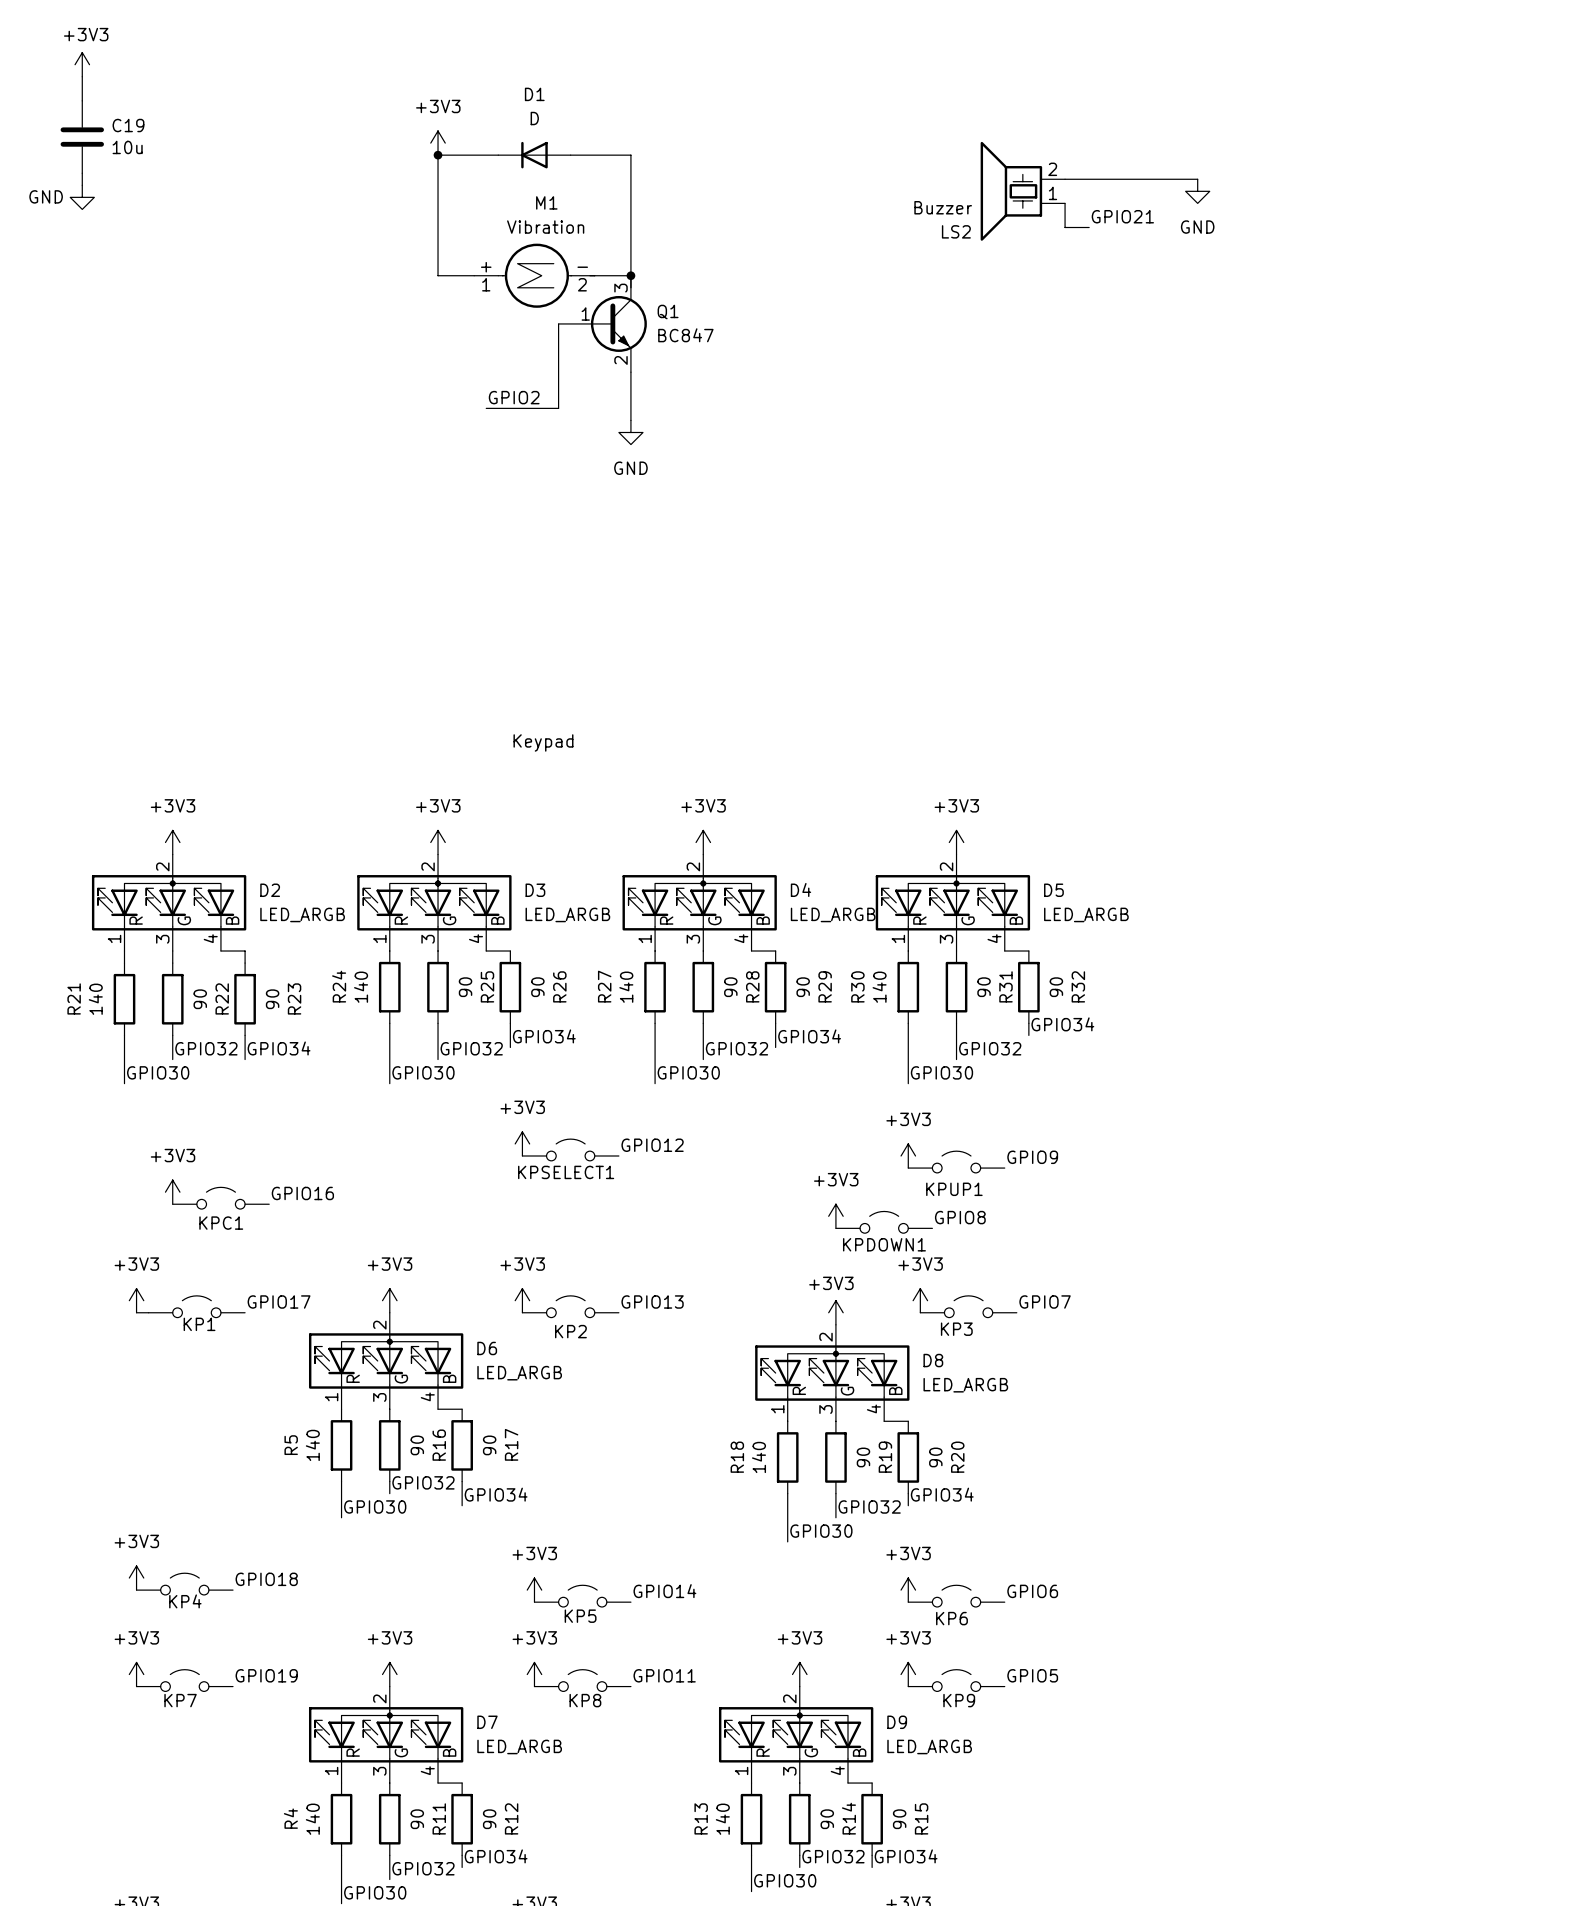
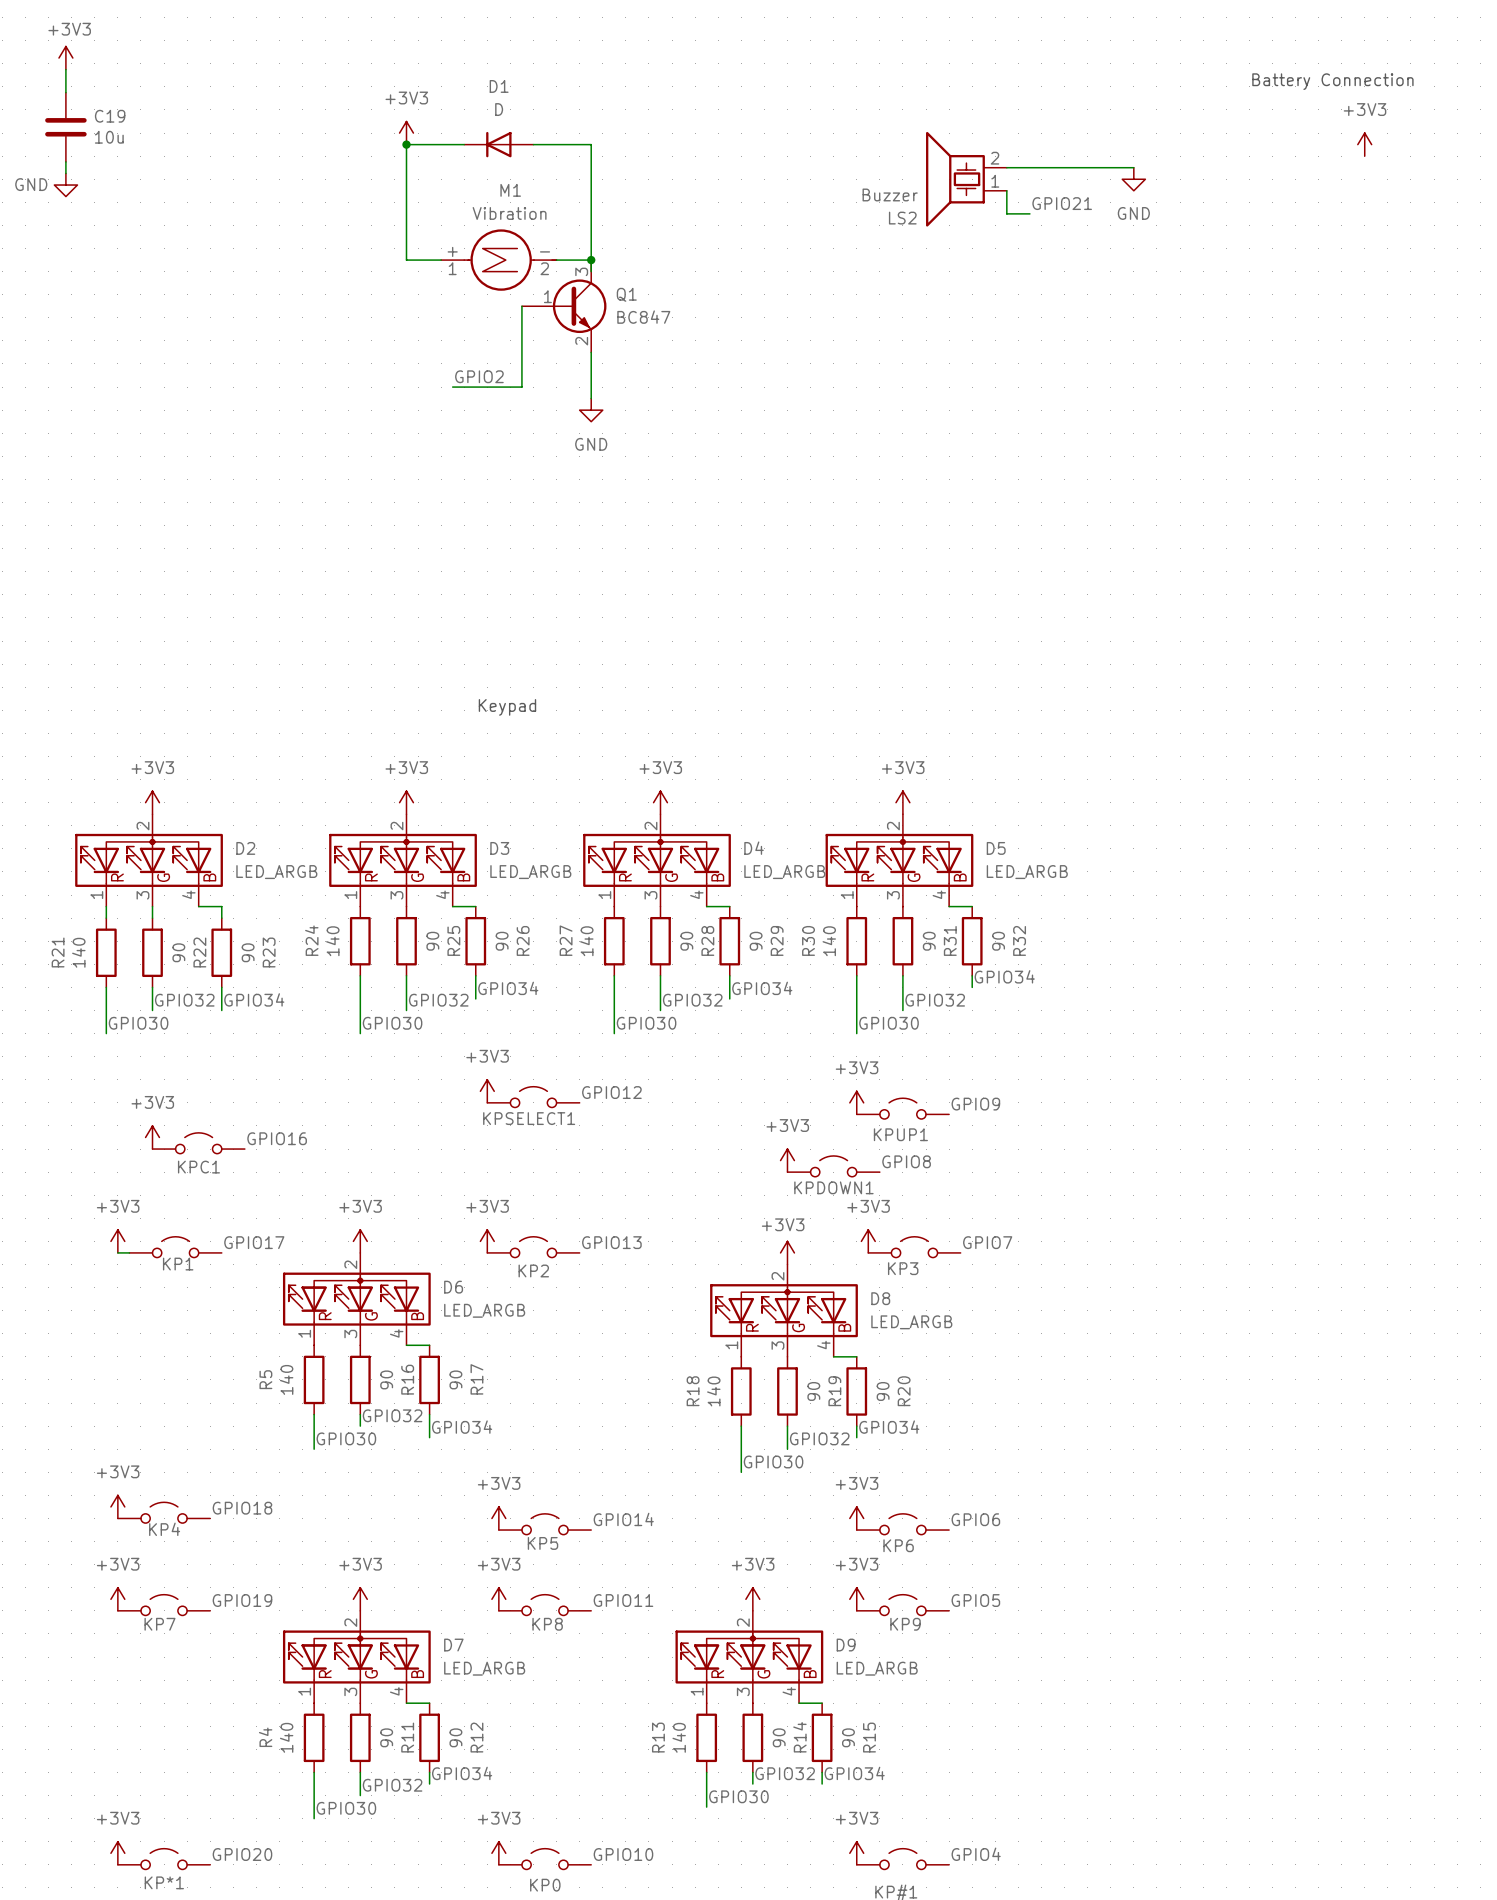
text: none -> Battery Connection (1332, 81)
power symbol: none -> +3V3 (1364, 144)

